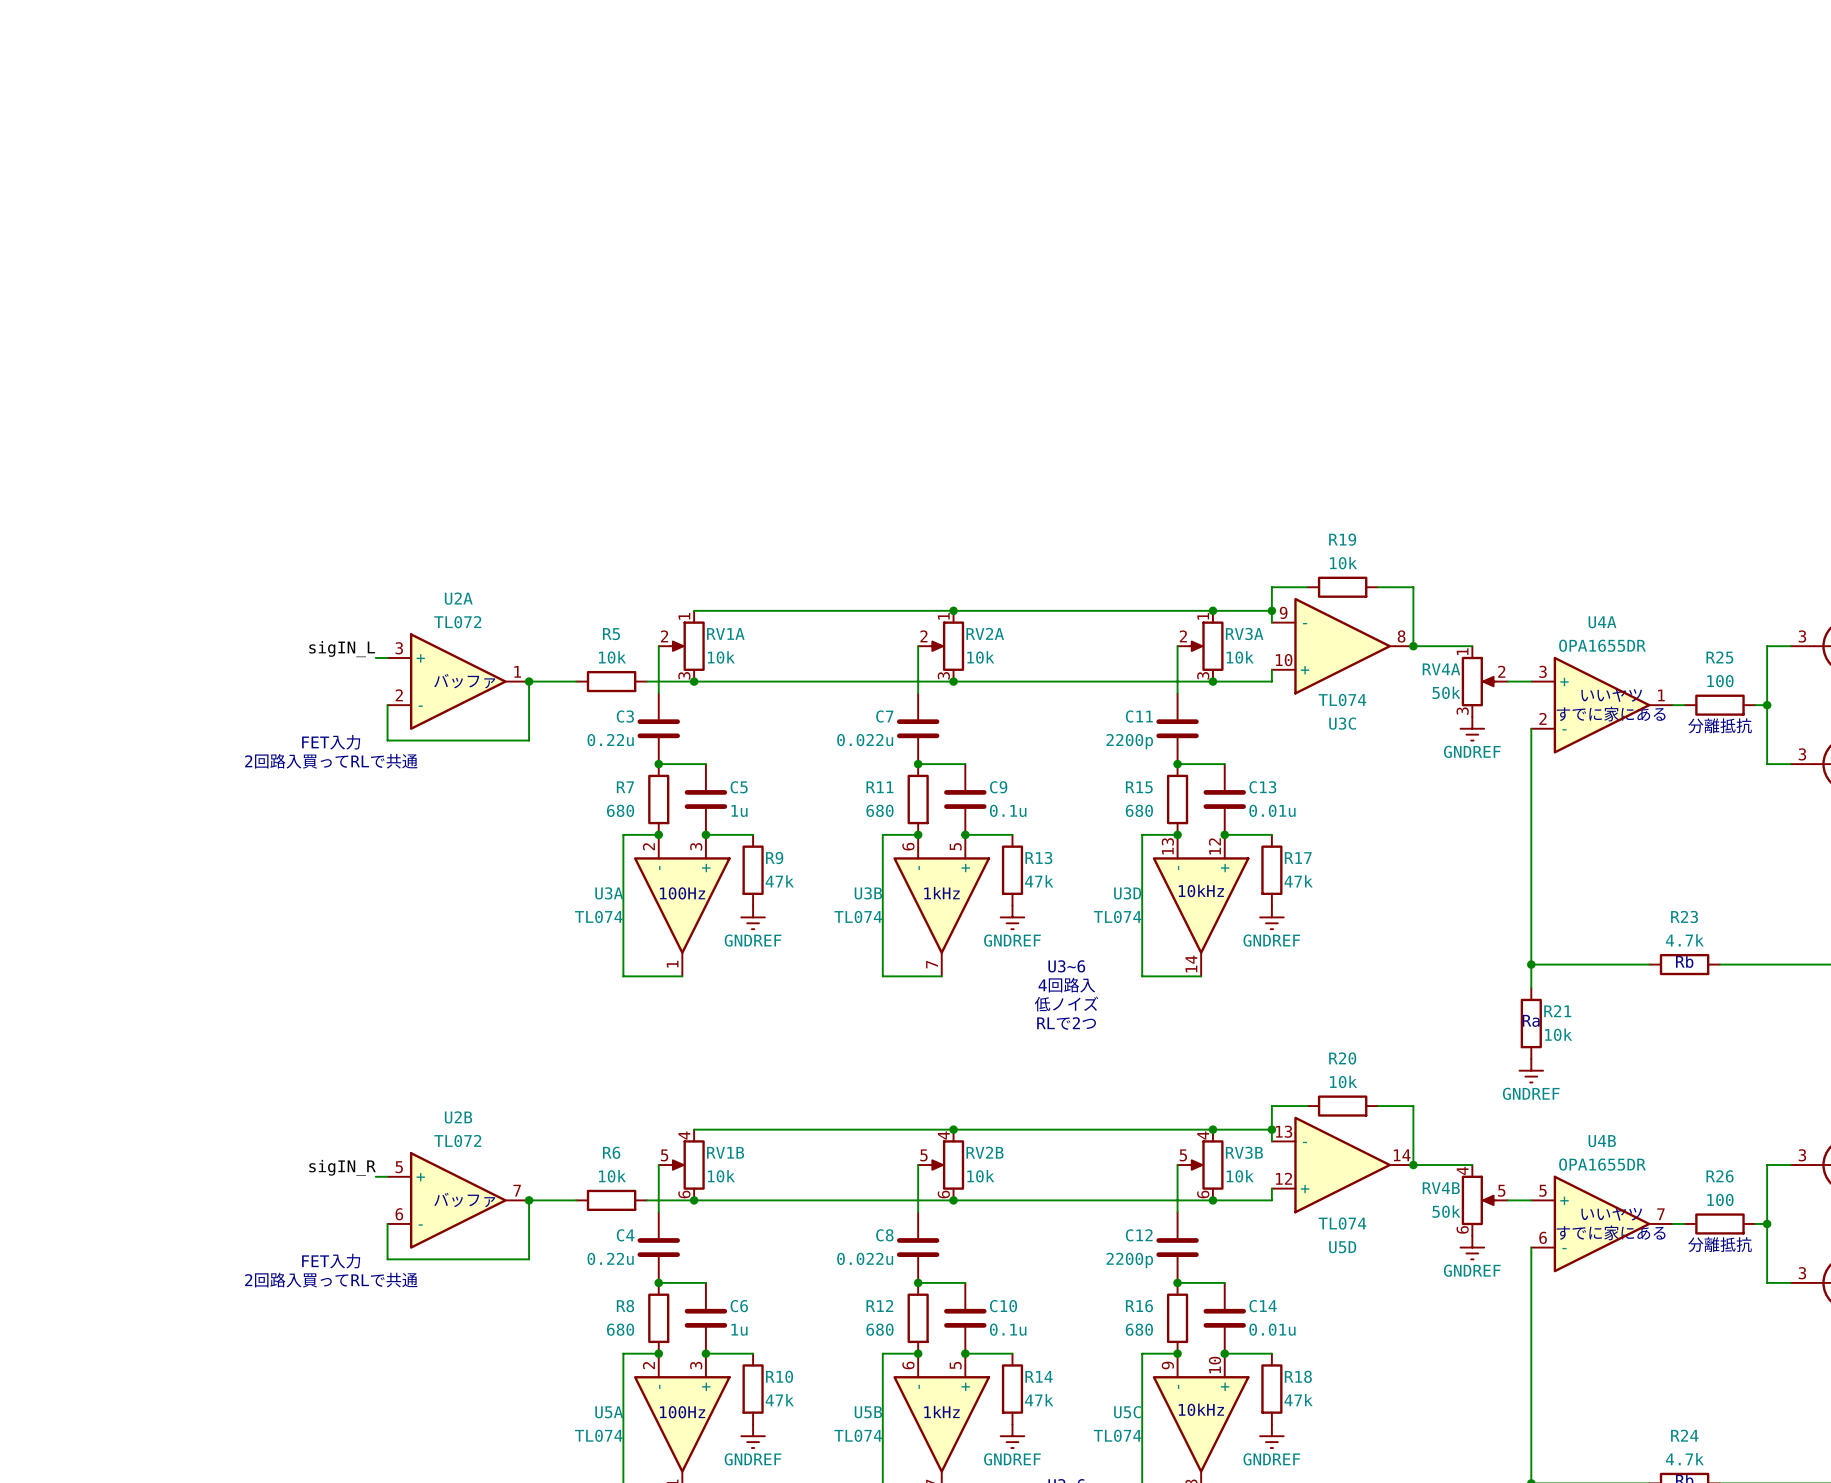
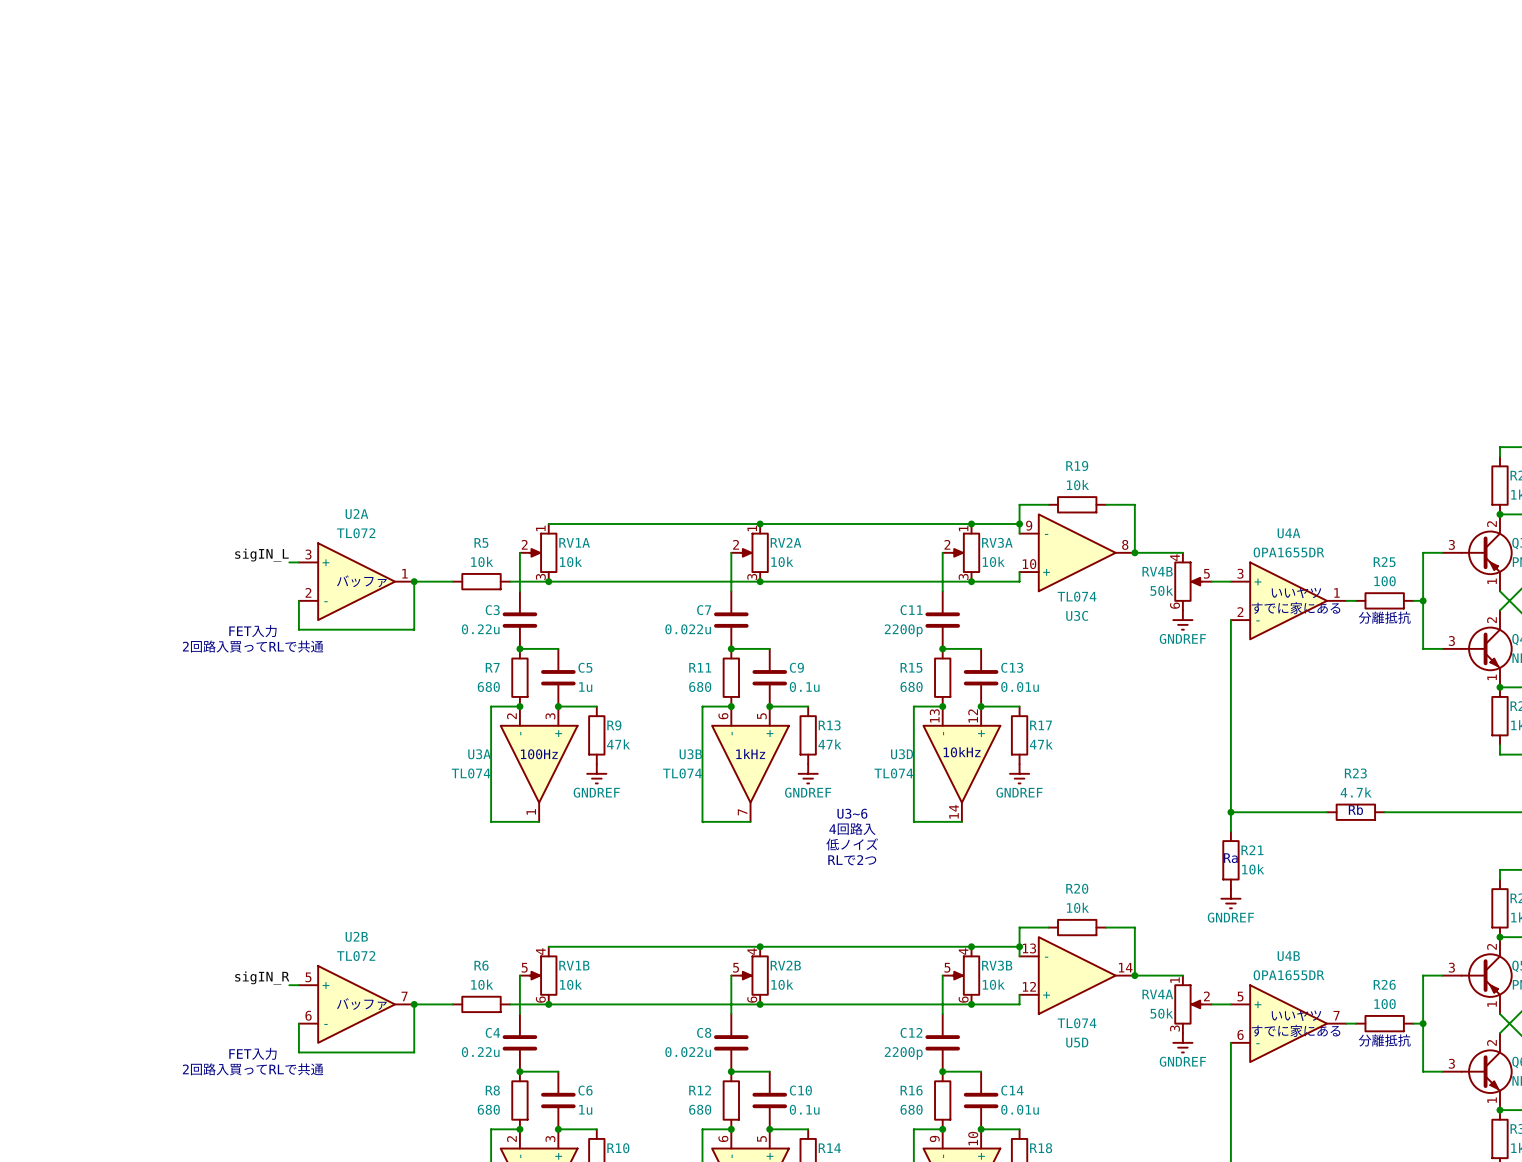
RV4A position: (1484, 681) -> (1192, 1004)
RV4B position: (1484, 1200) -> (1192, 581)

